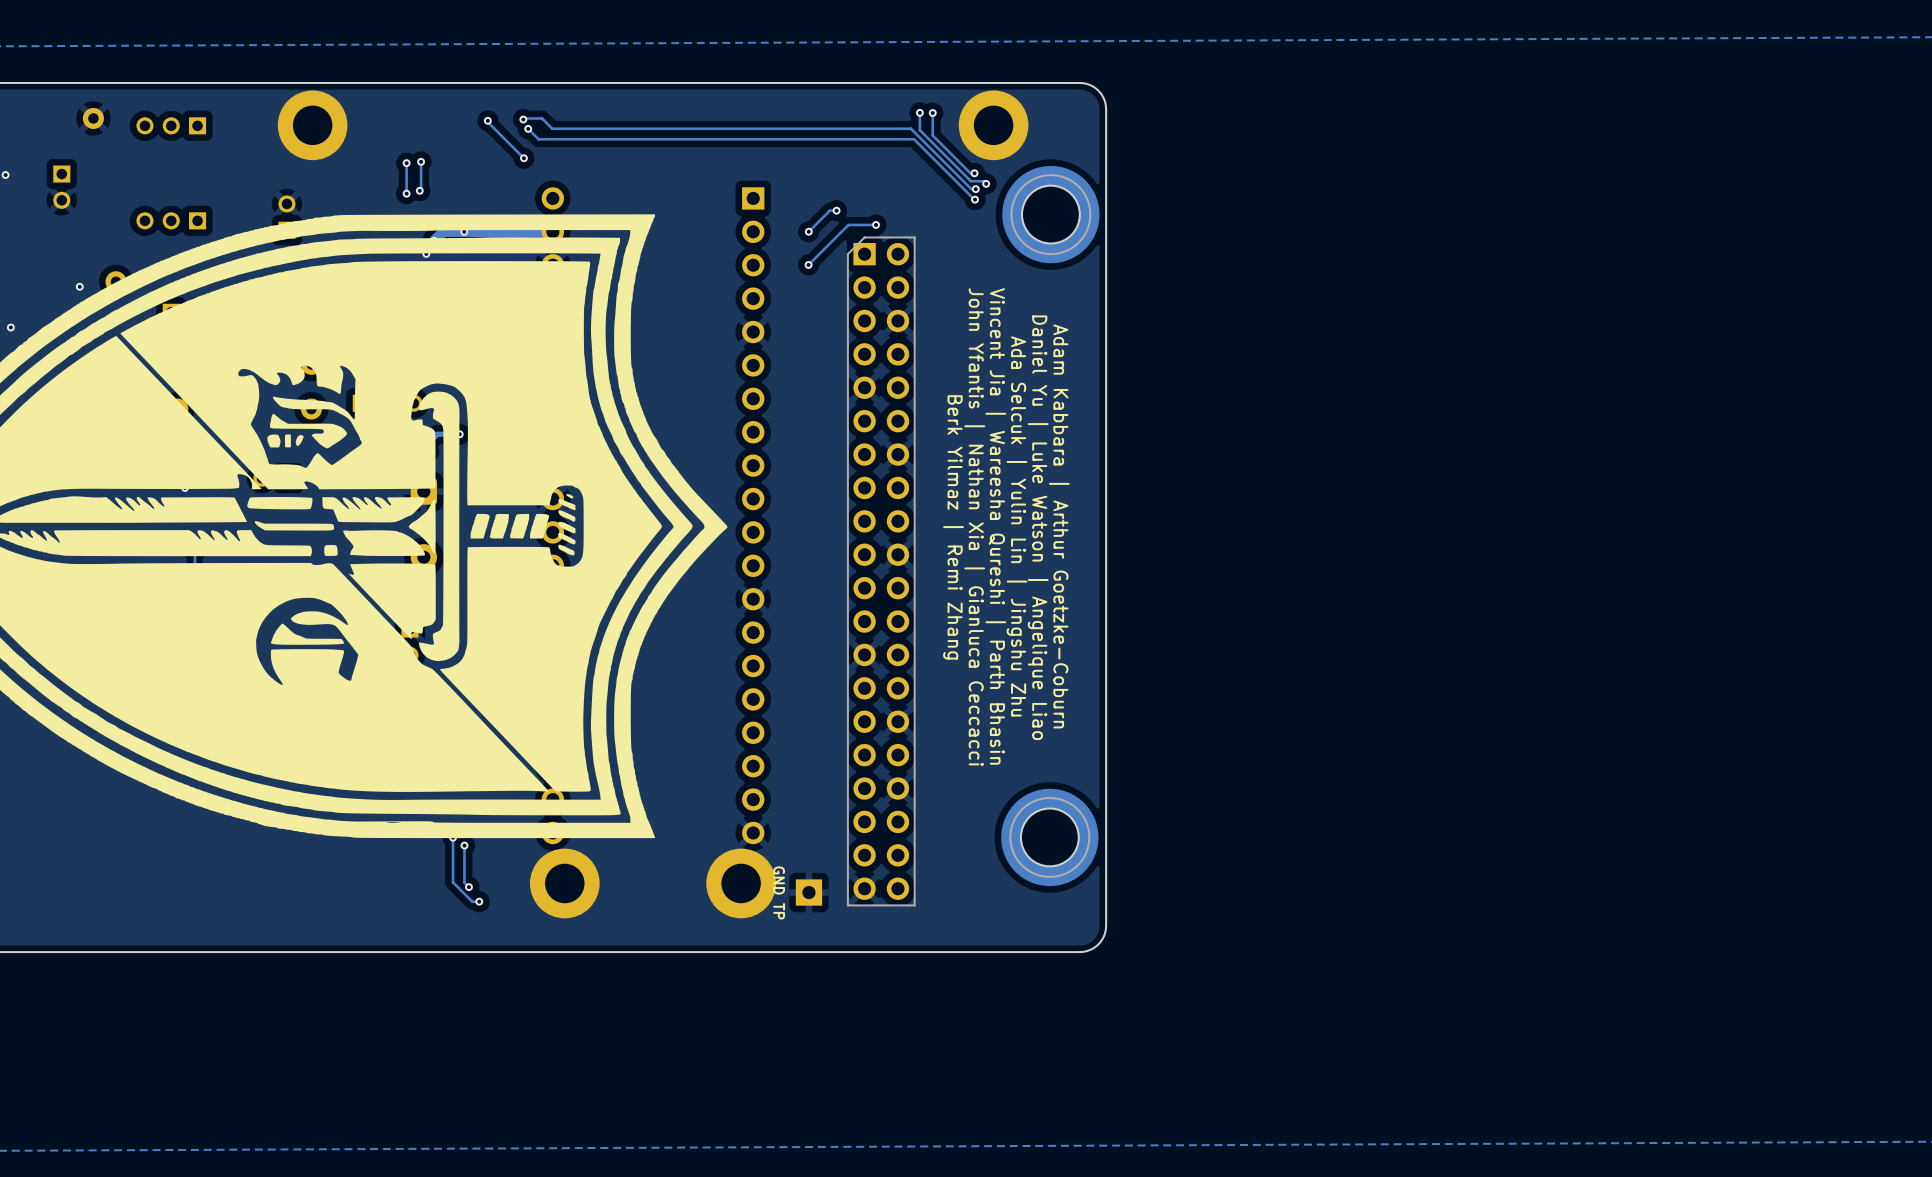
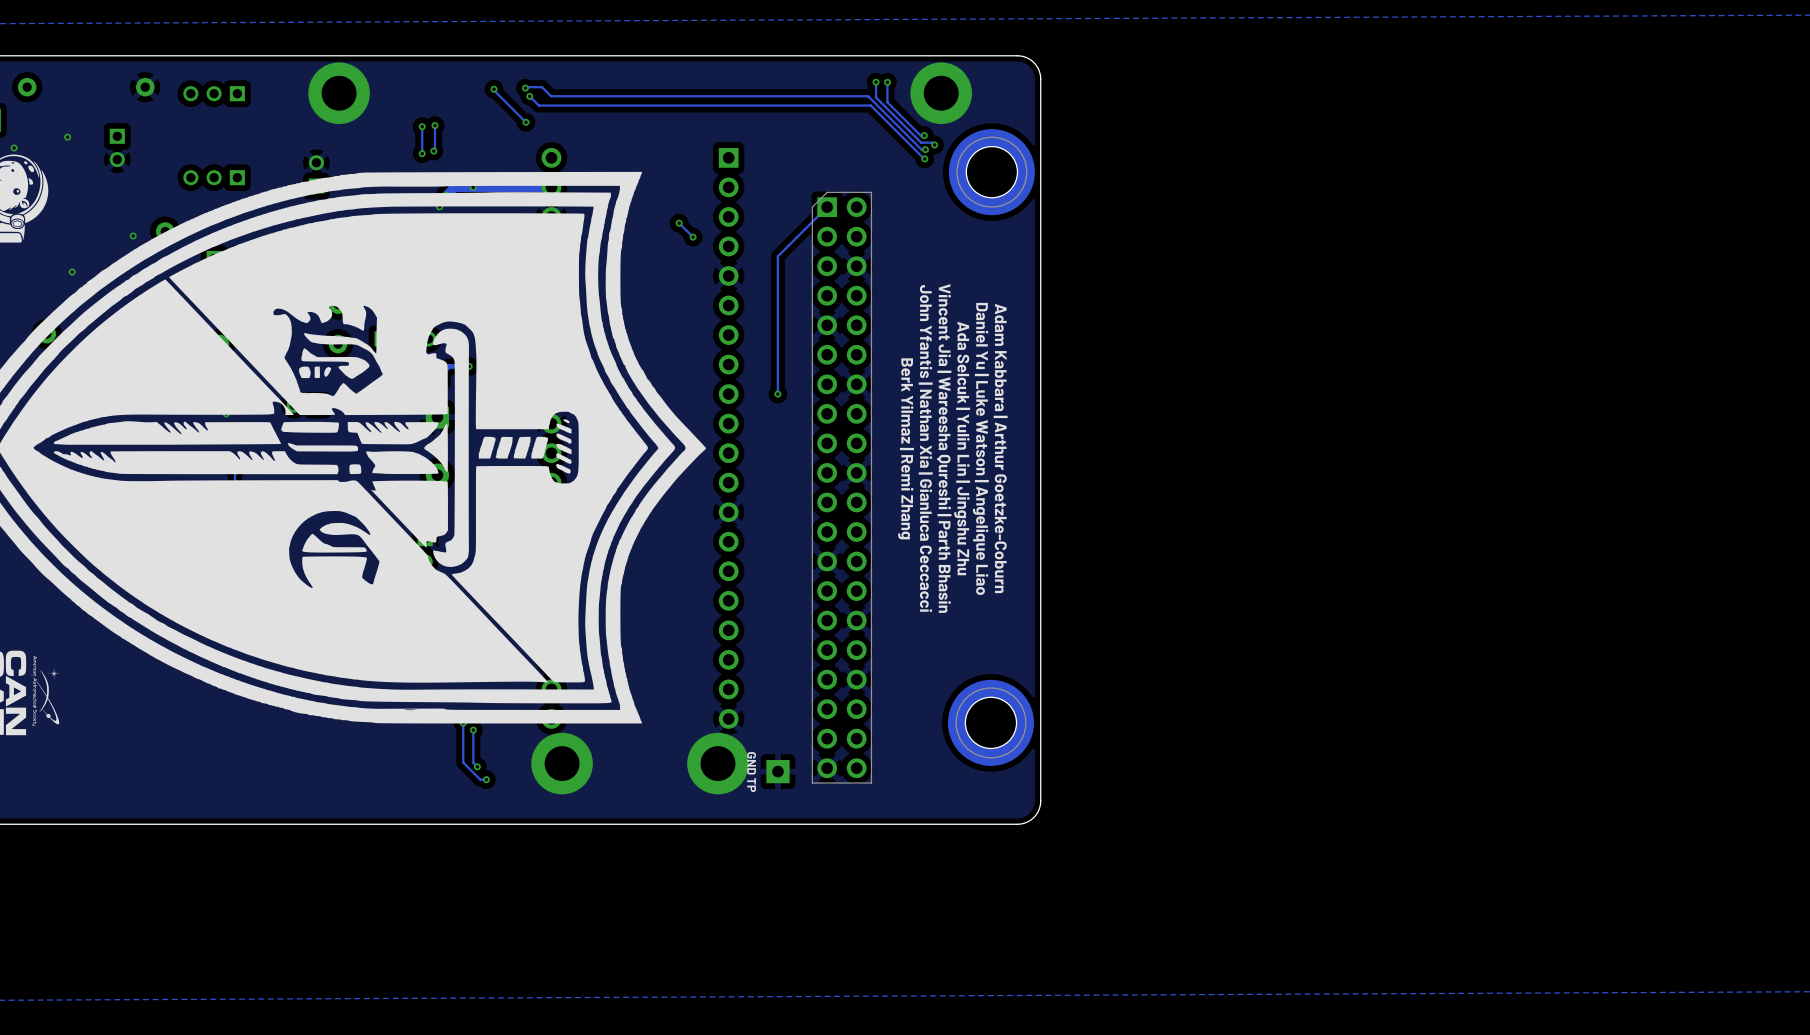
track: (836, 210) (829, 210) (808, 231) -> none
via: (836, 210) -> none
track: (876, 224) (848, 224) (808, 264) -> none
via: (876, 224) -> none
via: (808, 231) -> none
track: none -> (827, 207) (777, 256) (777, 394)
via: (808, 264) -> none
track: none -> (679, 223) (693, 237)
via: none -> (679, 223)
via: none -> (693, 237)
via: none -> (777, 394)

